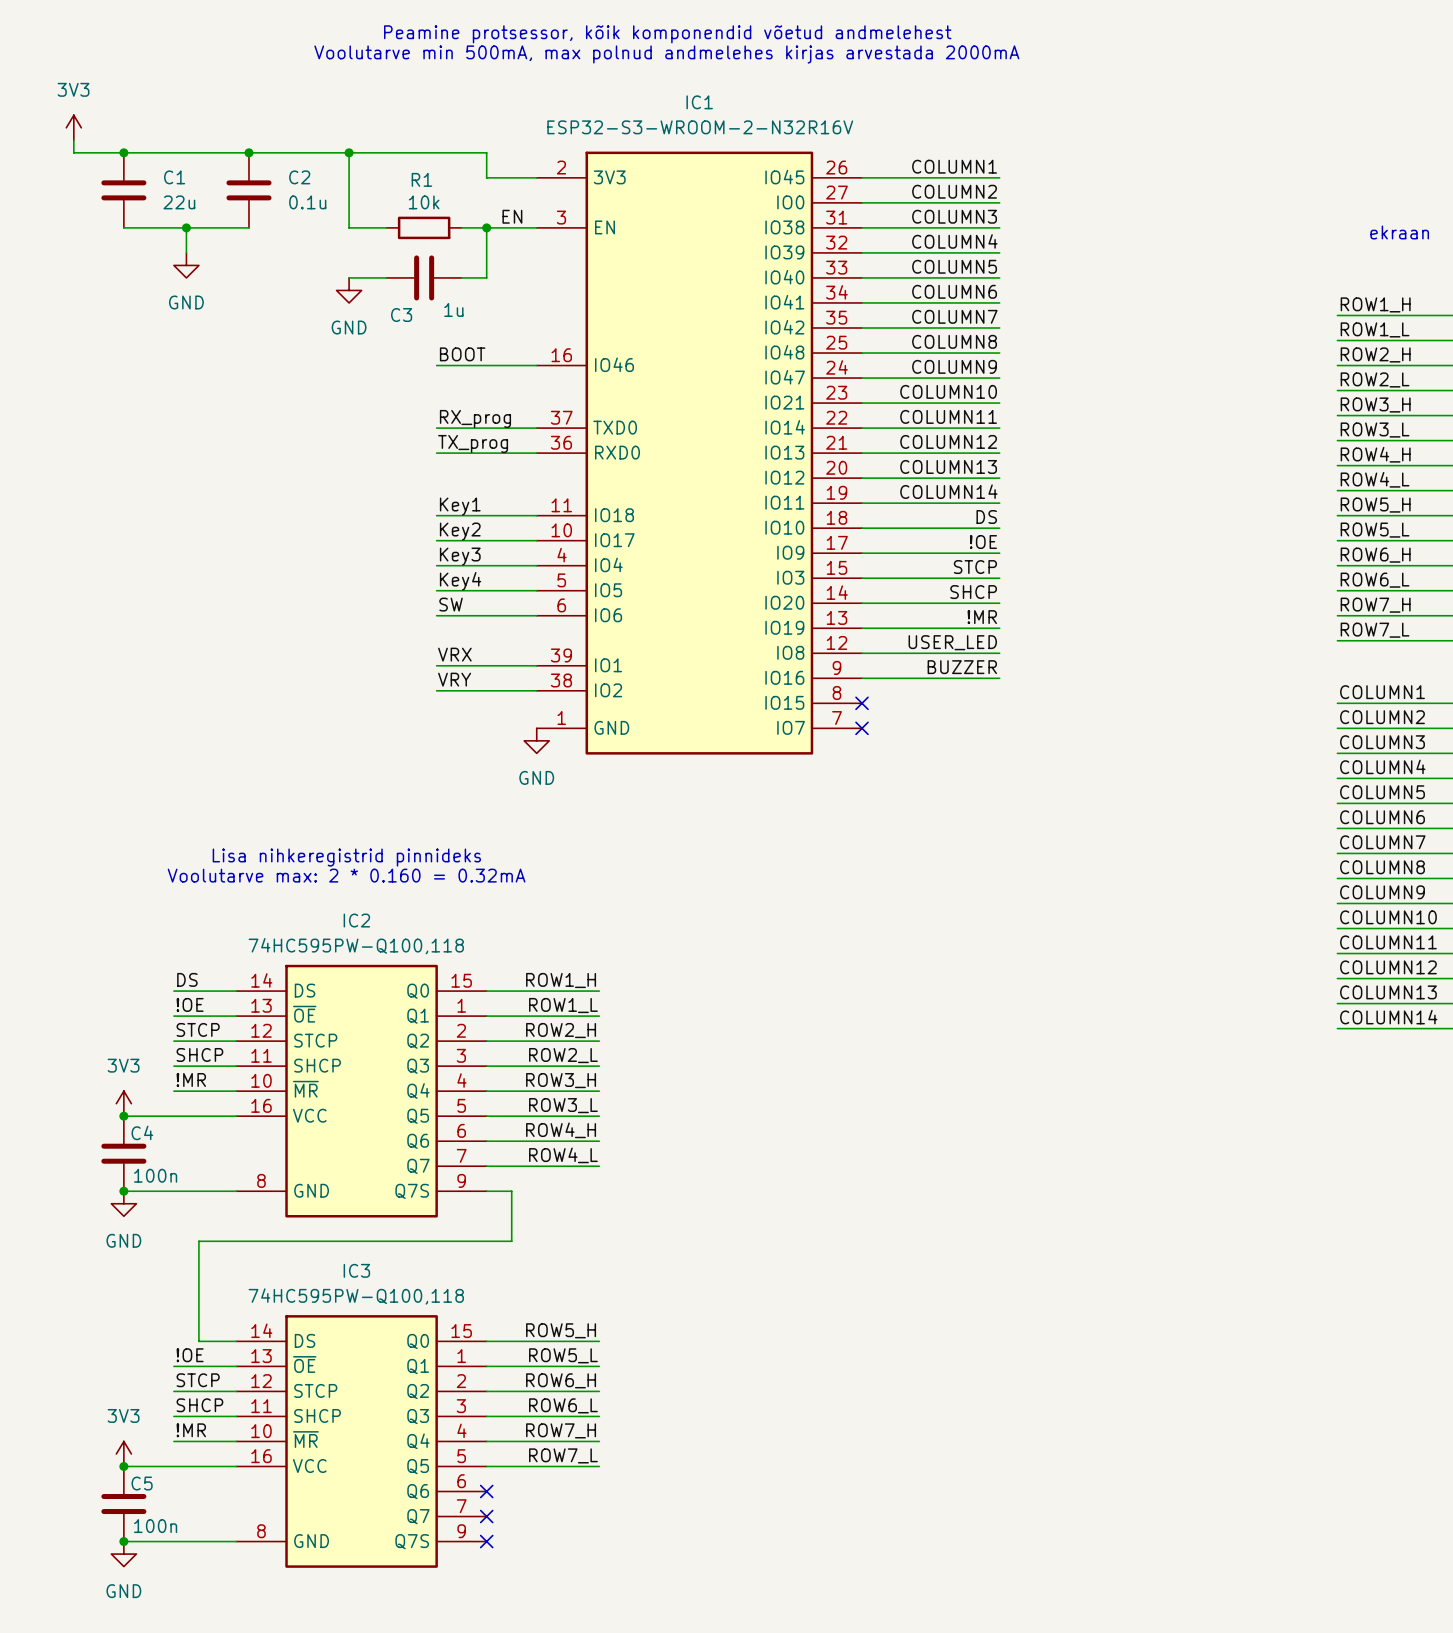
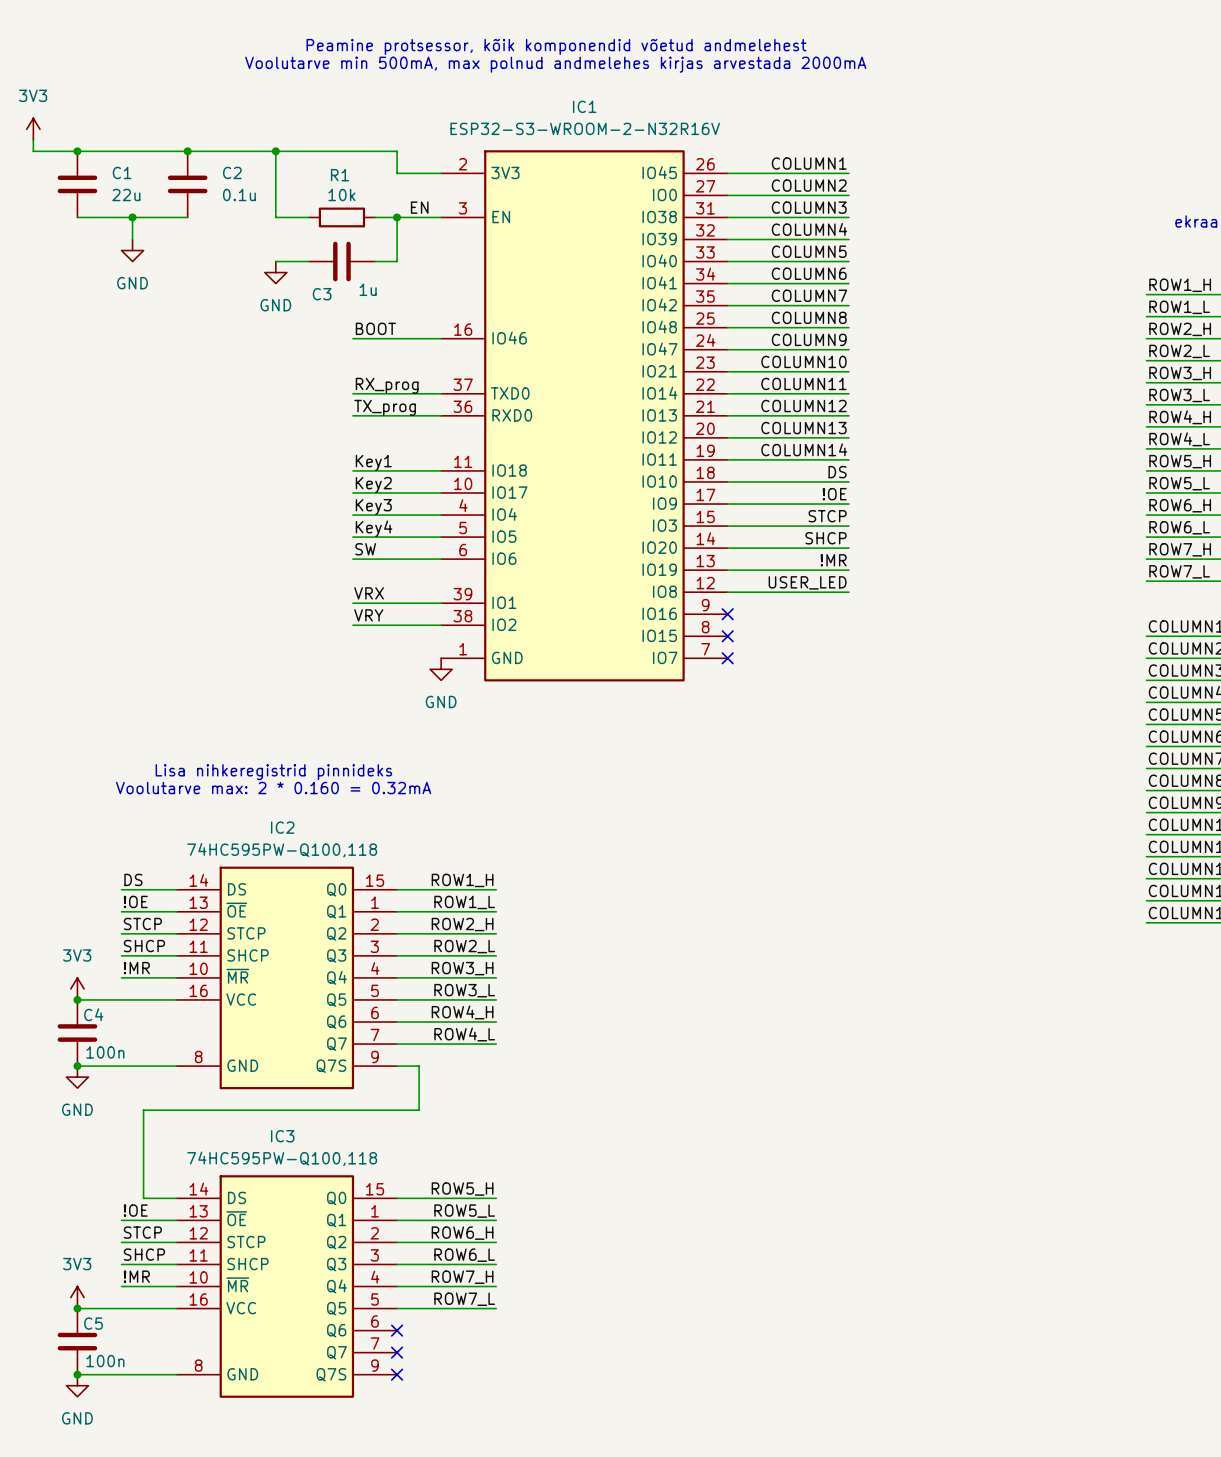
label: BUZZER (962, 667) -> none
wire: (862, 678) (999, 678) -> none
no-connect mark: none -> (727, 614)

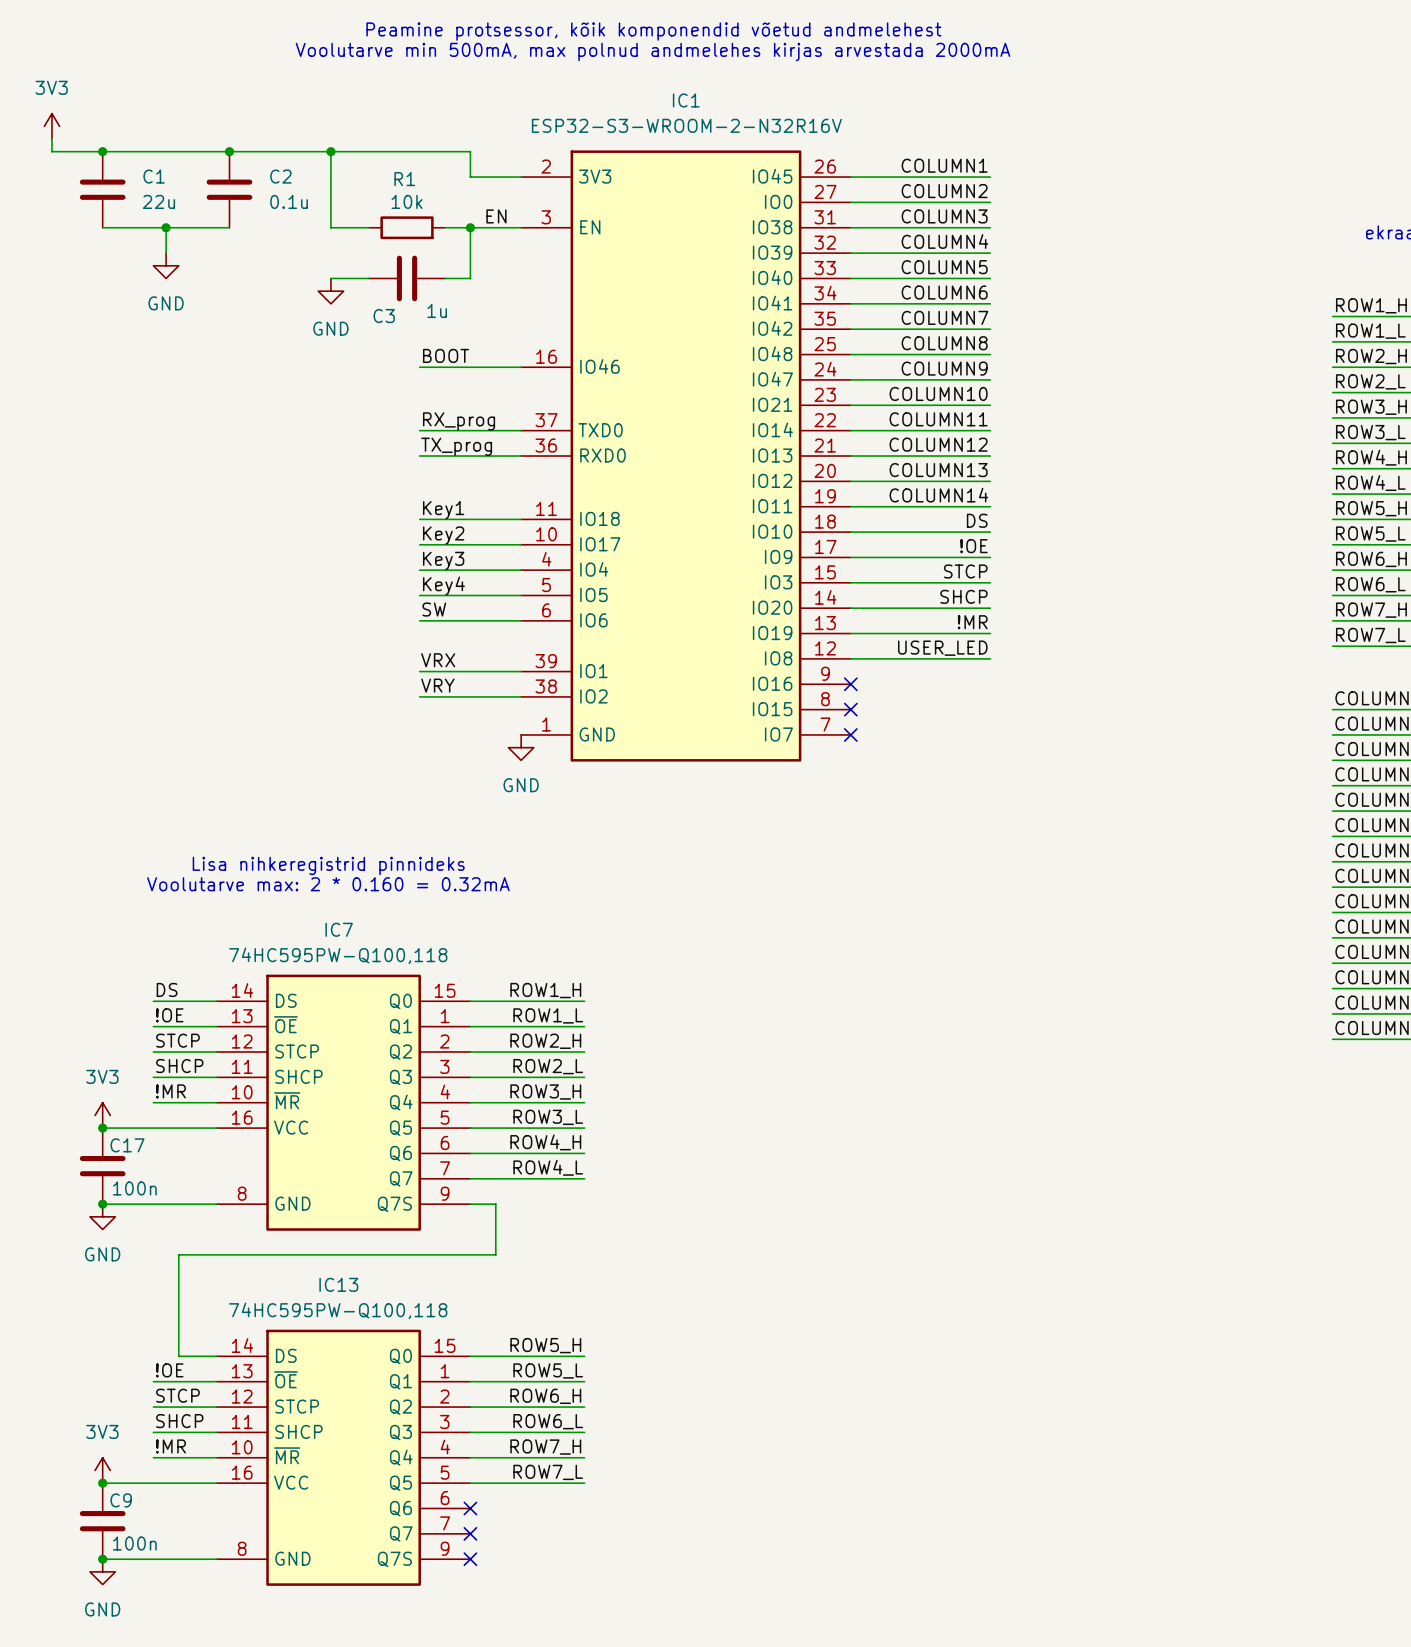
IC2 name: IC2 (282, 827) -> IC7 (339, 929)
C4 name: C4 (93, 1014) -> C17 (127, 1145)
IC3 name: IC3 (282, 1136) -> IC13 (338, 1284)
C5 name: C5 (93, 1323) -> C9 (121, 1500)

